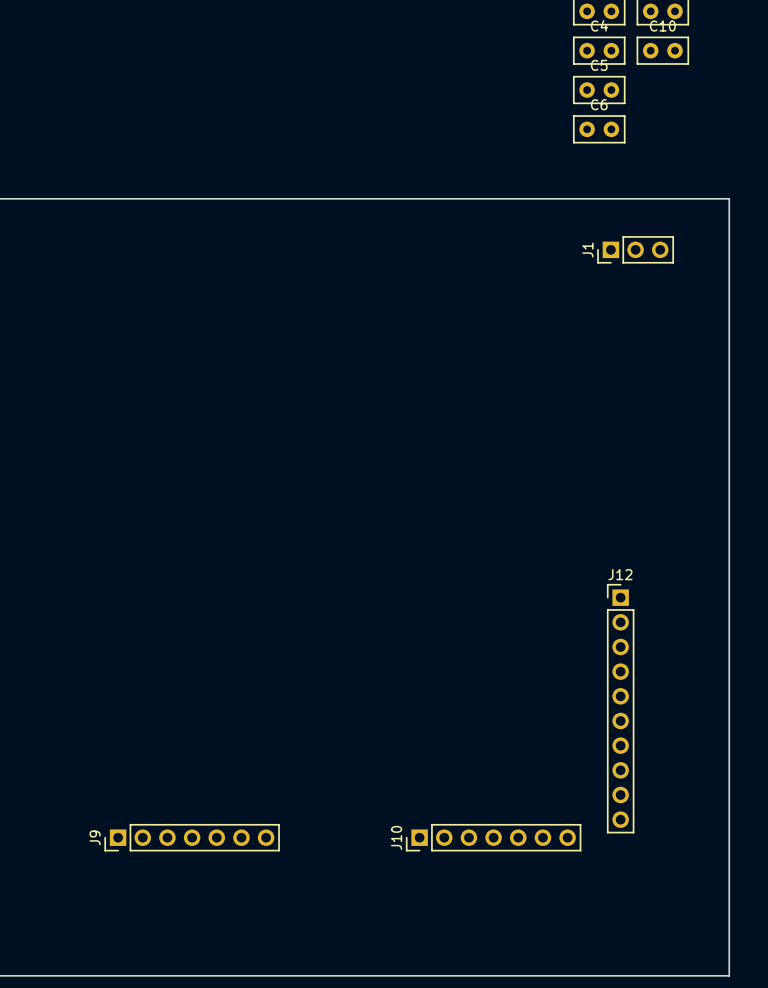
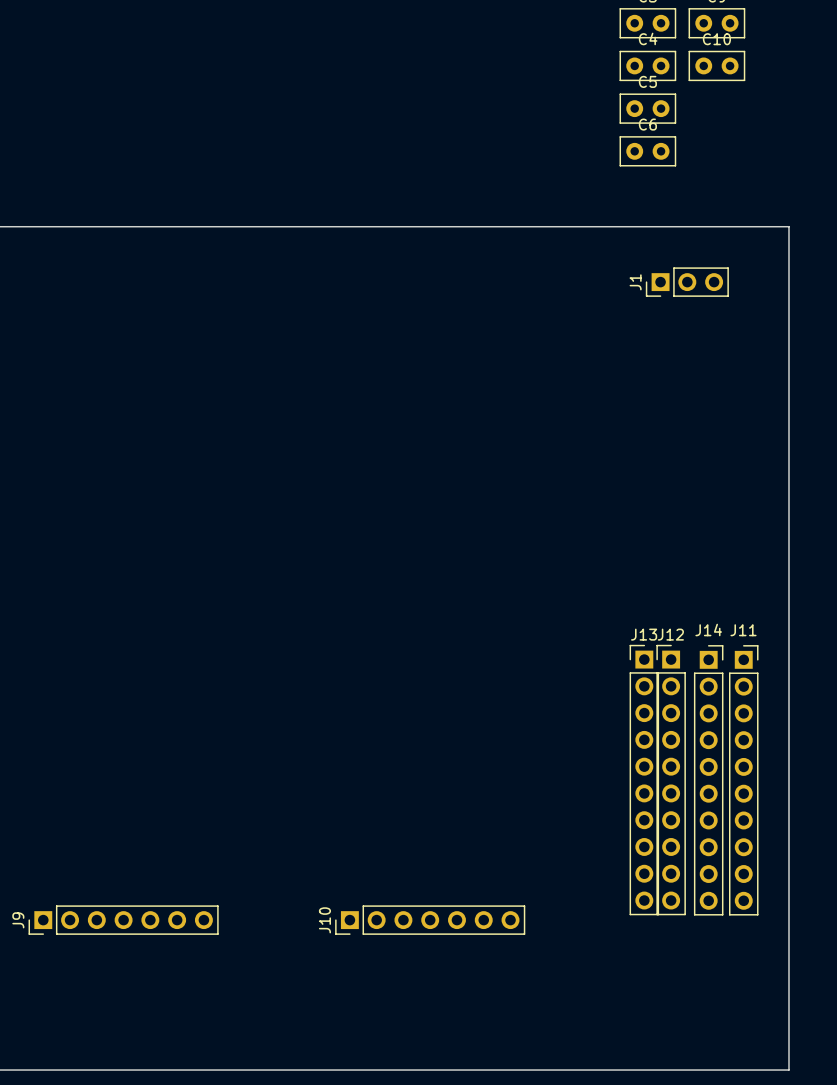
J13: none -> (644, 780)
J14: none -> (708, 780)
J11: none -> (743, 780)
J9 position: (192, 837) -> (123, 920)
J10 position: (493, 837) -> (430, 920)

